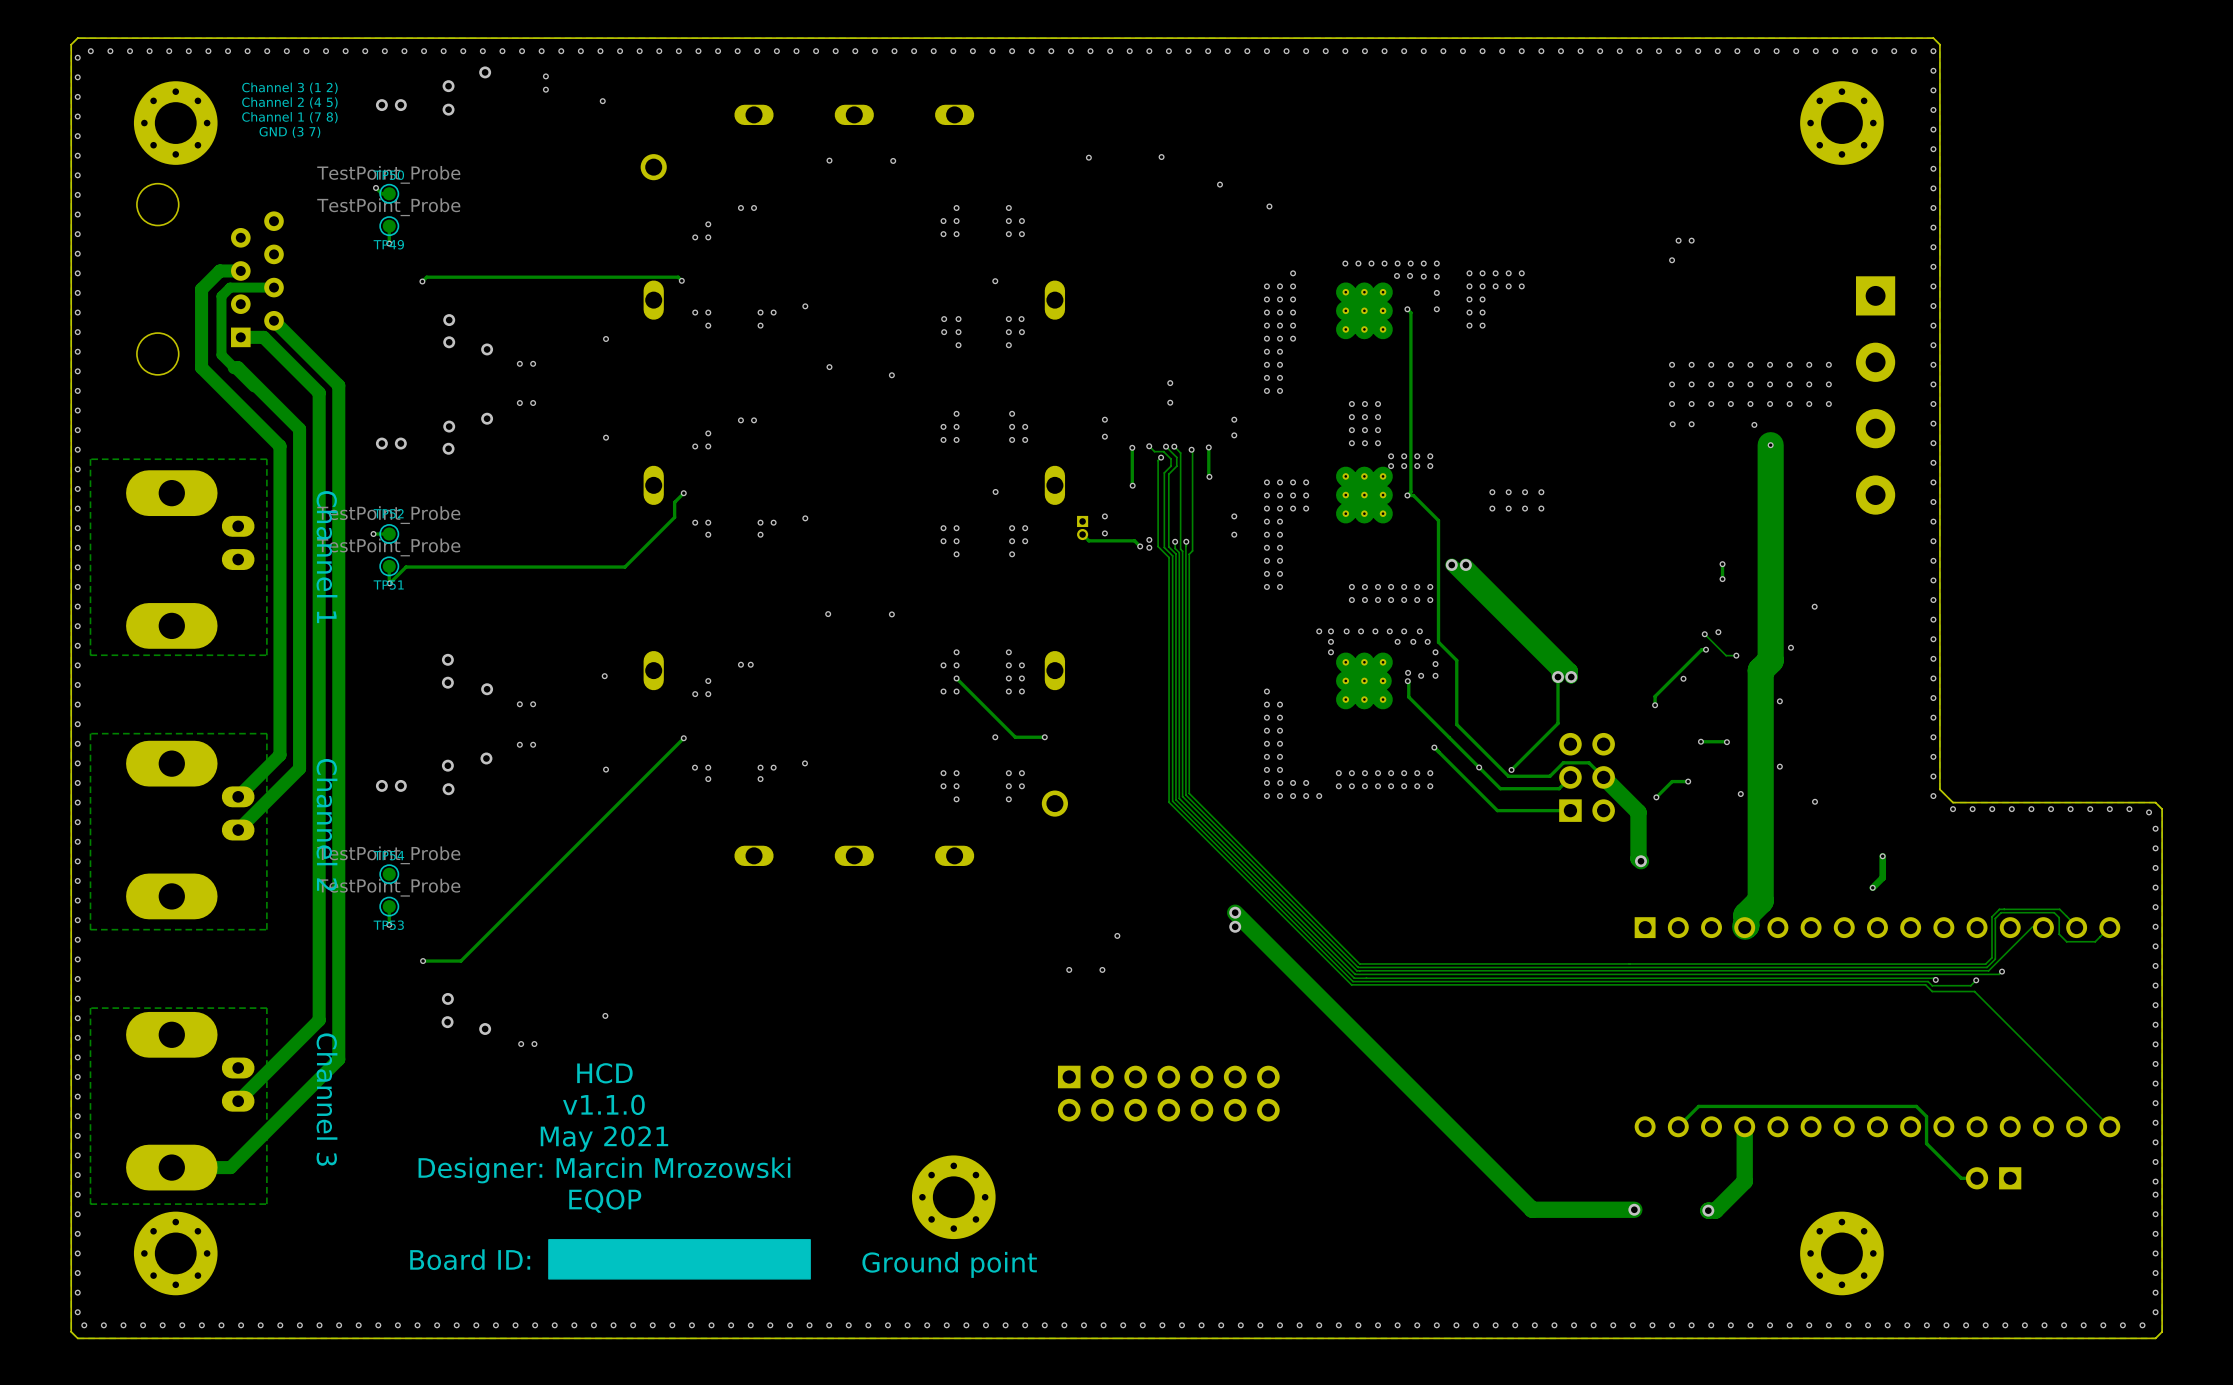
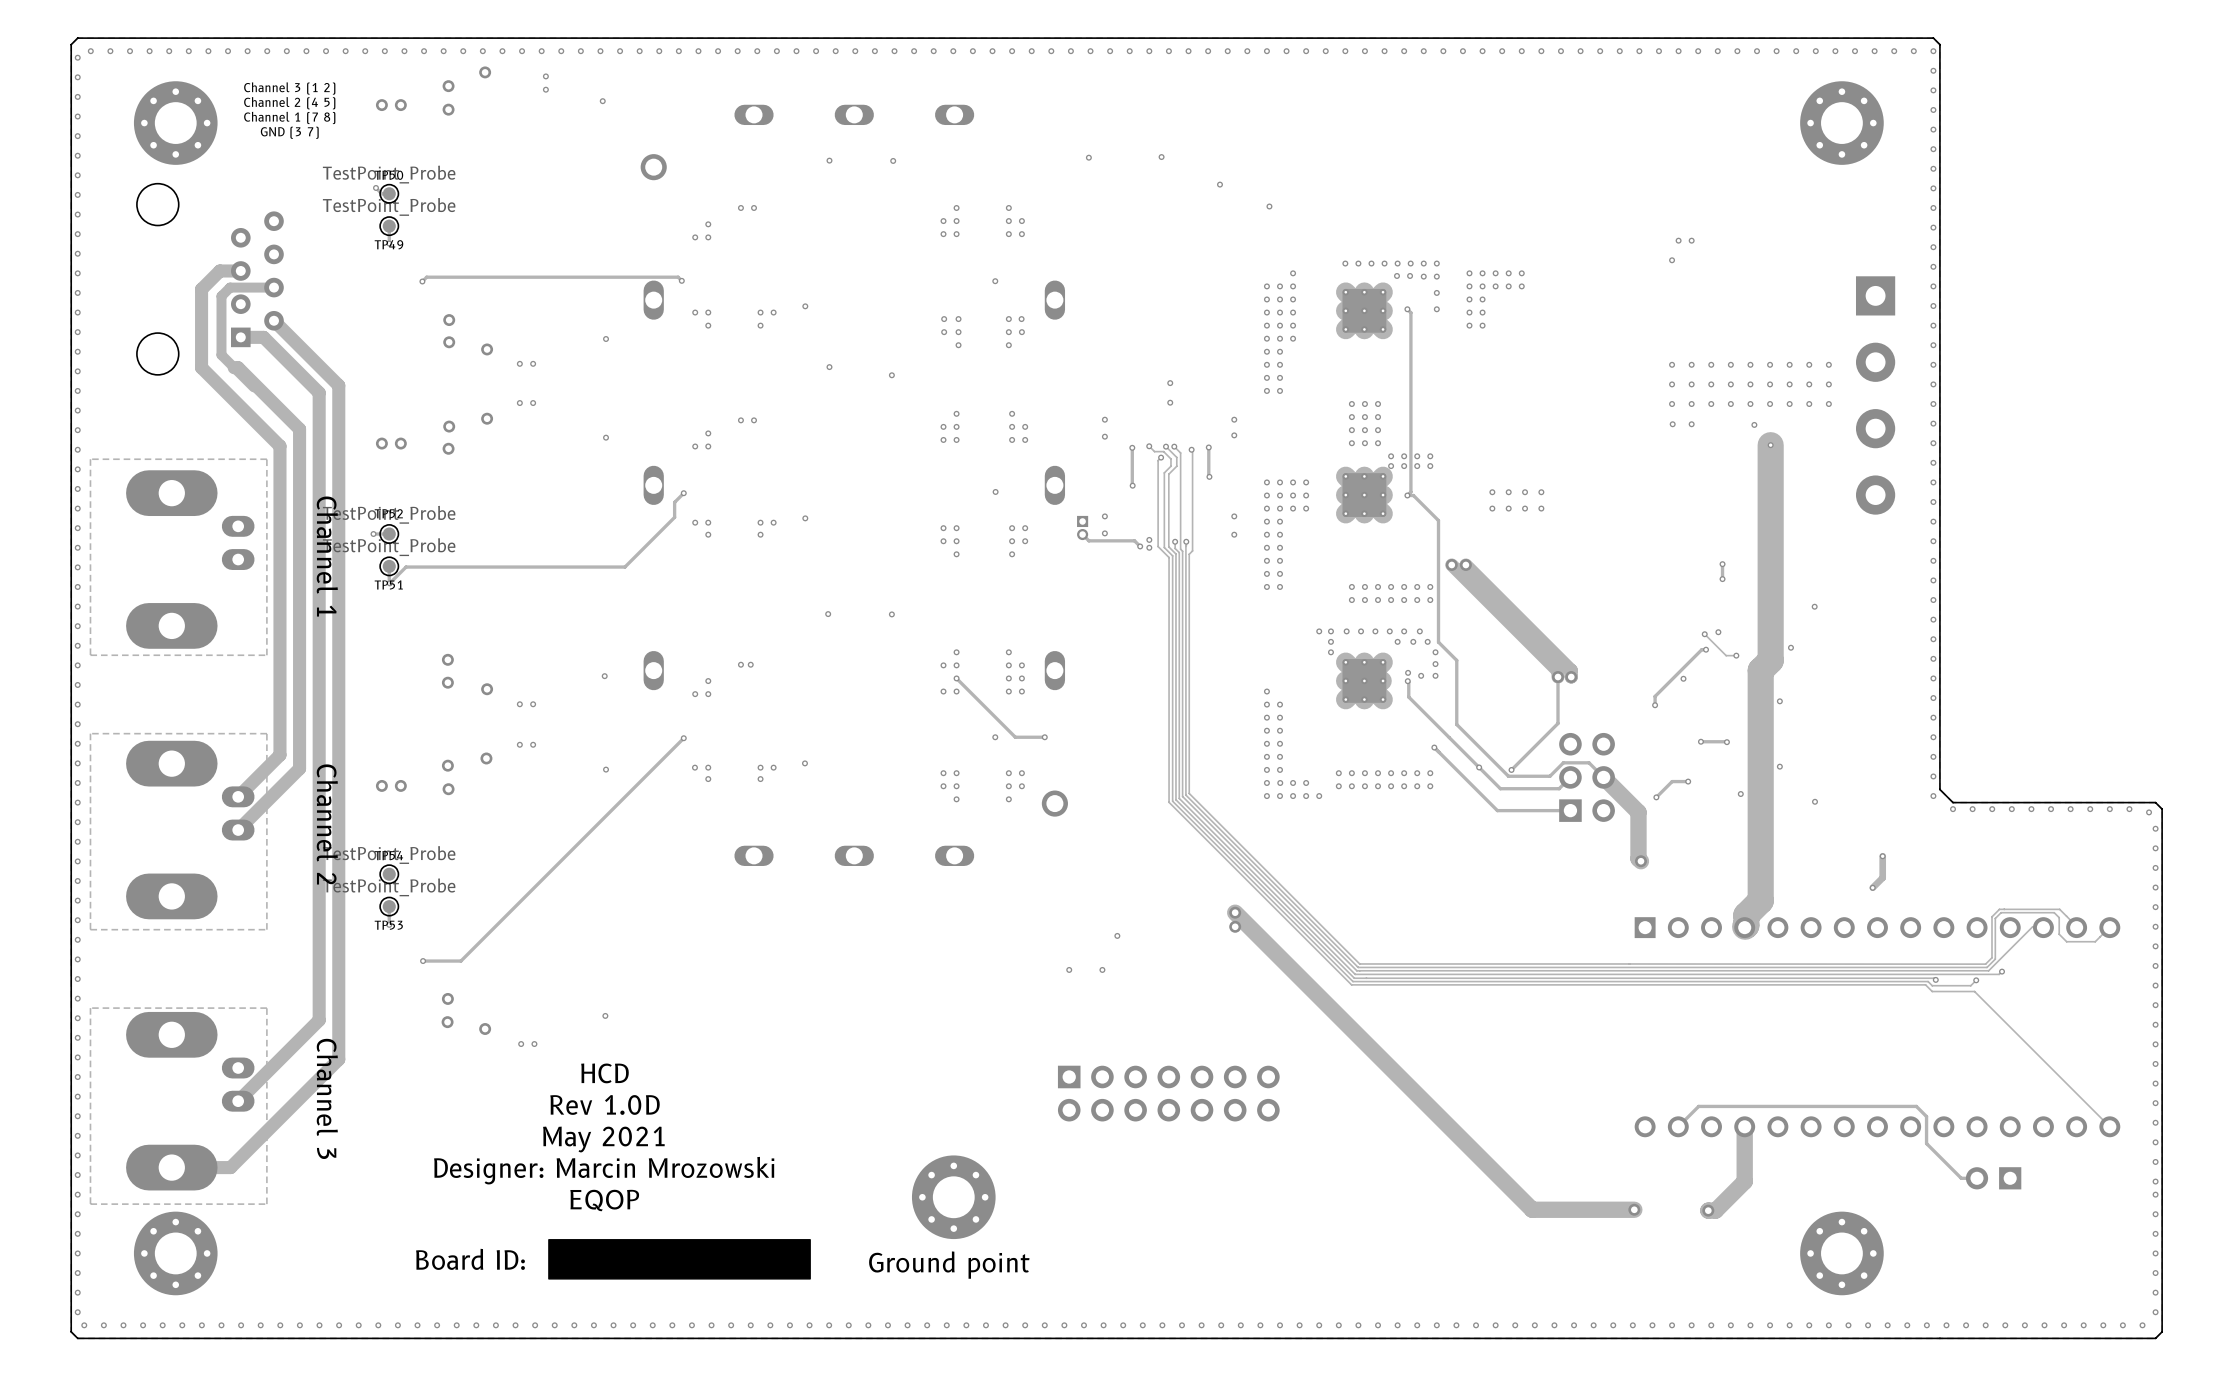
text: v1.1.0 (603, 1104) -> Rev 1.0D (605, 1104)

